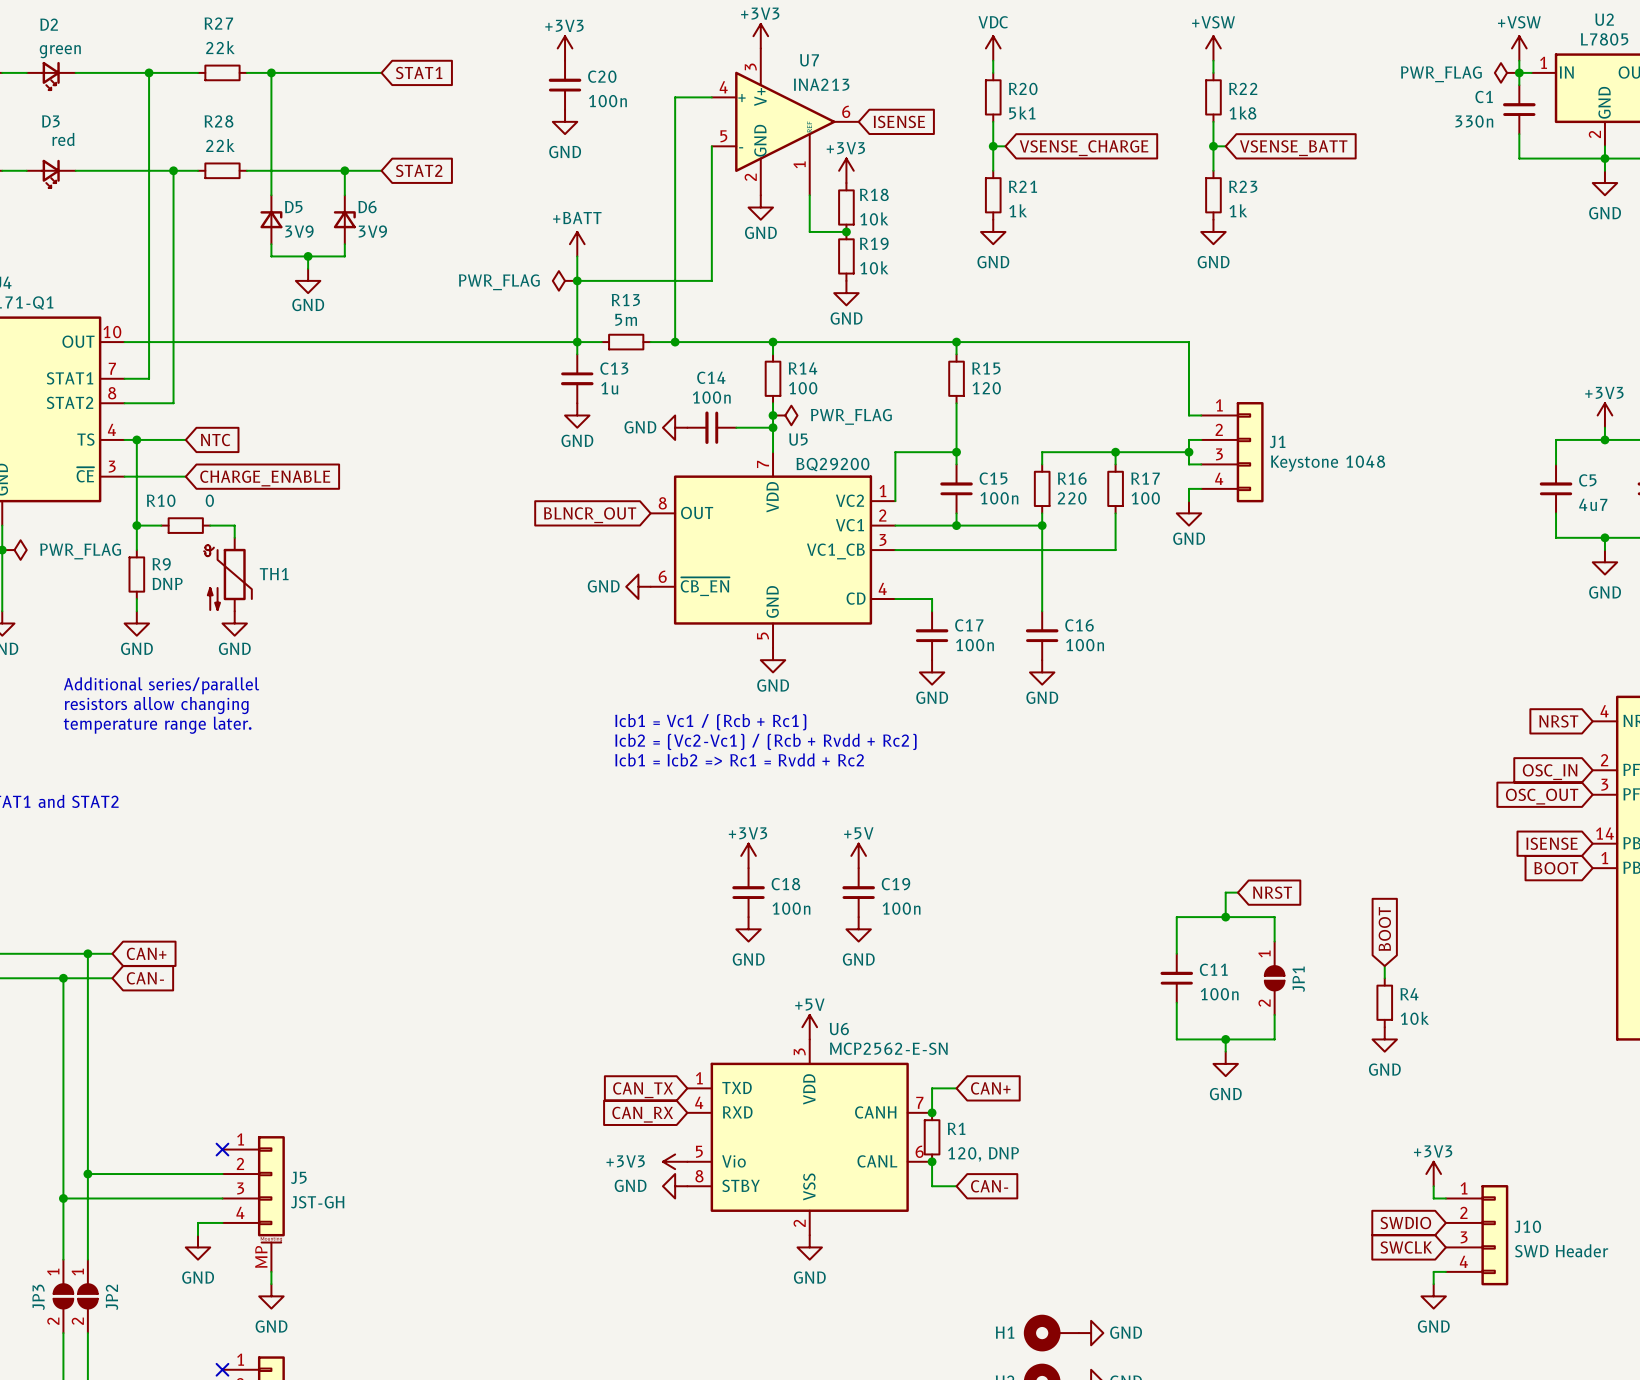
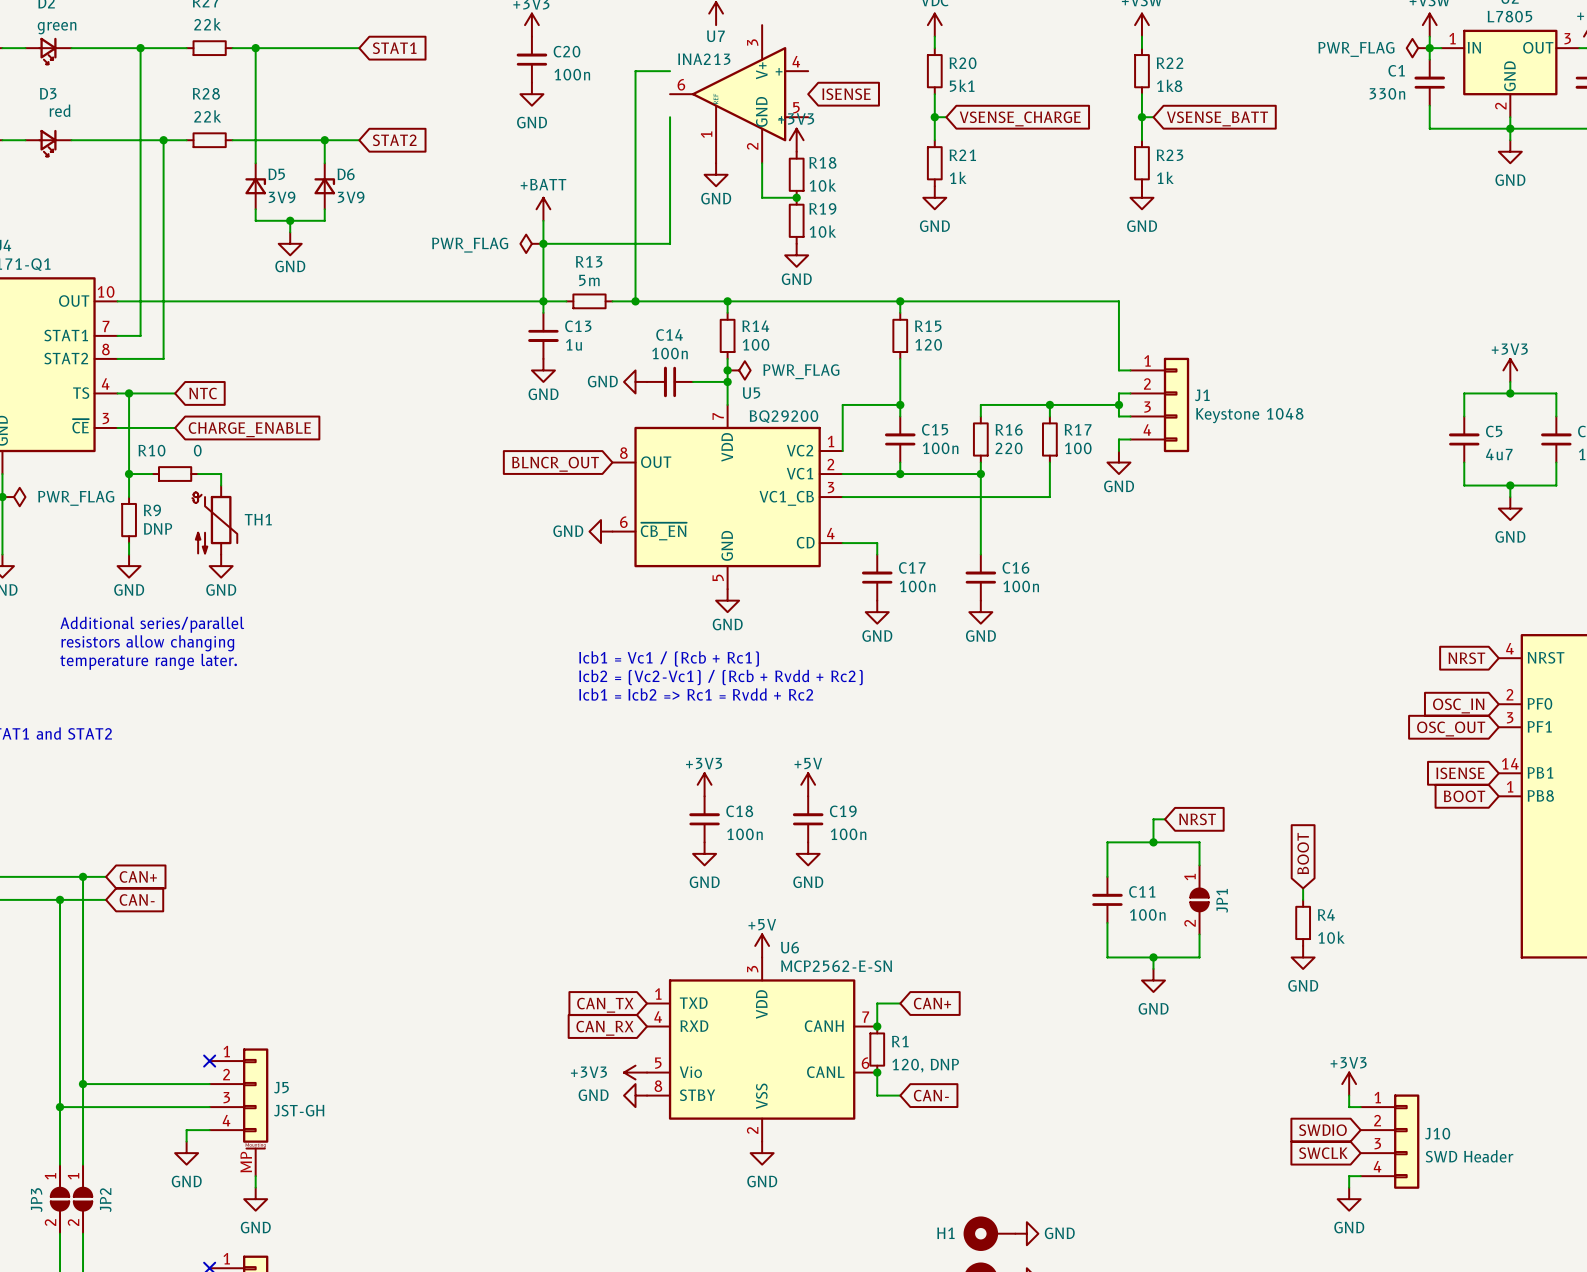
U7 flip: as is (785, 121) -> left-right (739, 94)

